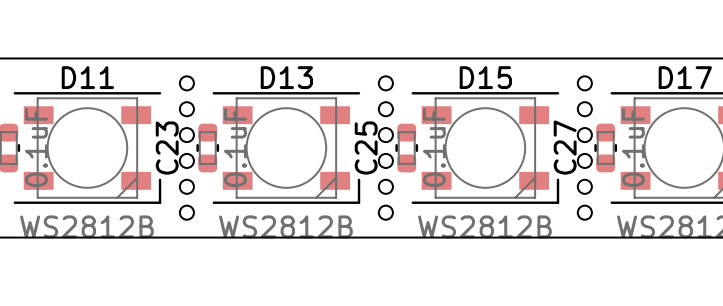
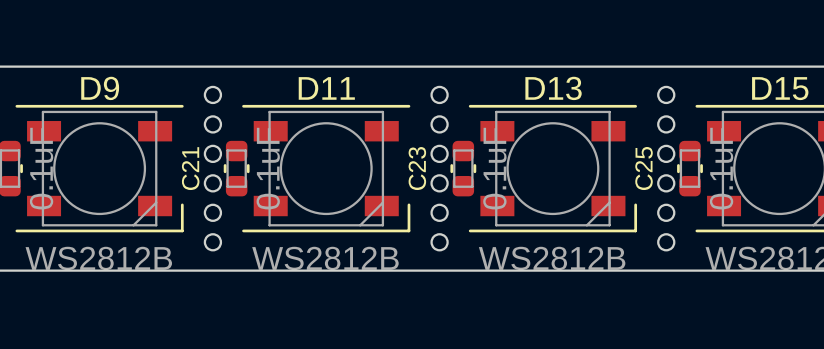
D11 name: D11 (87, 77) -> D9 (100, 88)
D13 name: D13 (286, 77) -> D11 (326, 88)
D15 name: D15 (485, 77) -> D13 (553, 88)
D17 name: D17 (685, 77) -> D15 (780, 88)
C27 name: C27 (565, 147) -> C25 (644, 168)
C23 name: C23 (167, 148) -> C21 (190, 168)
C25 name: C25 (366, 148) -> C23 (417, 168)

